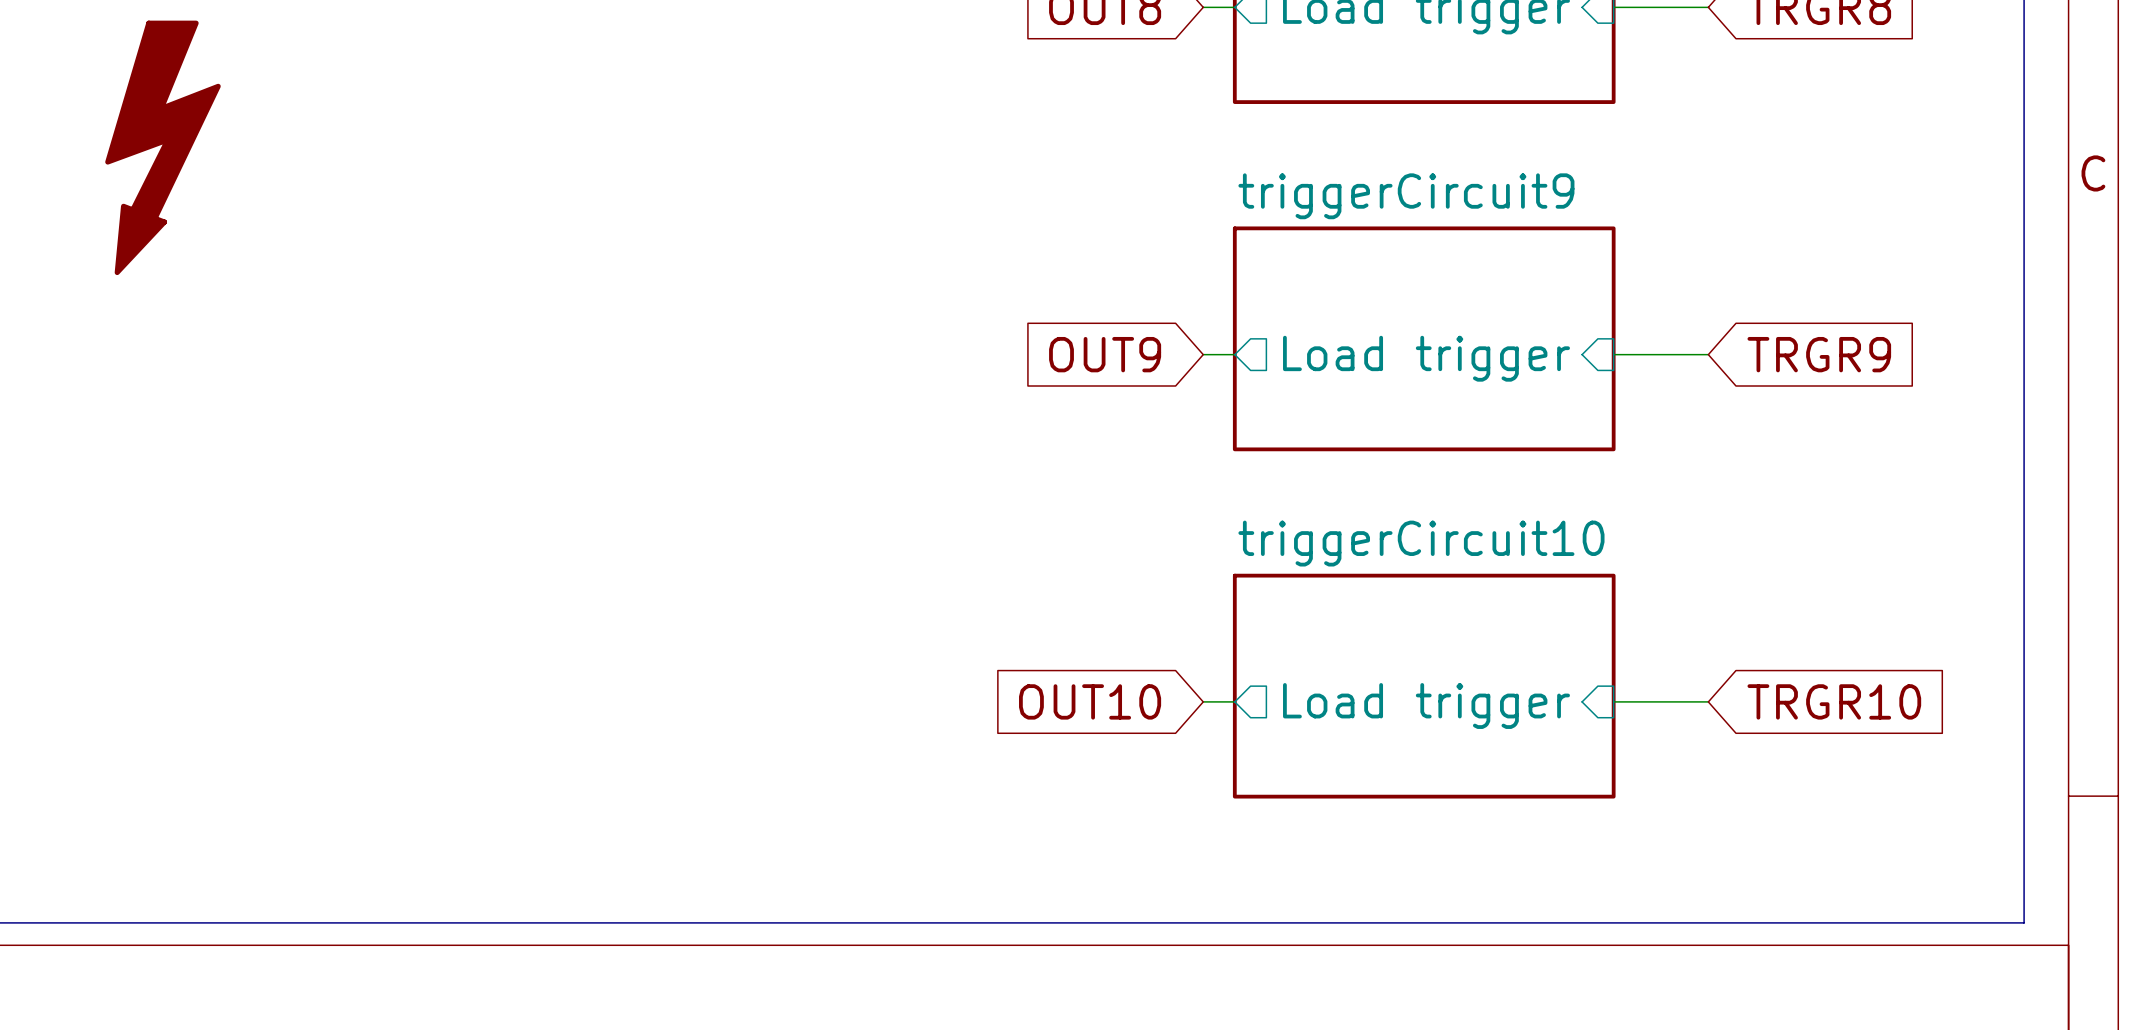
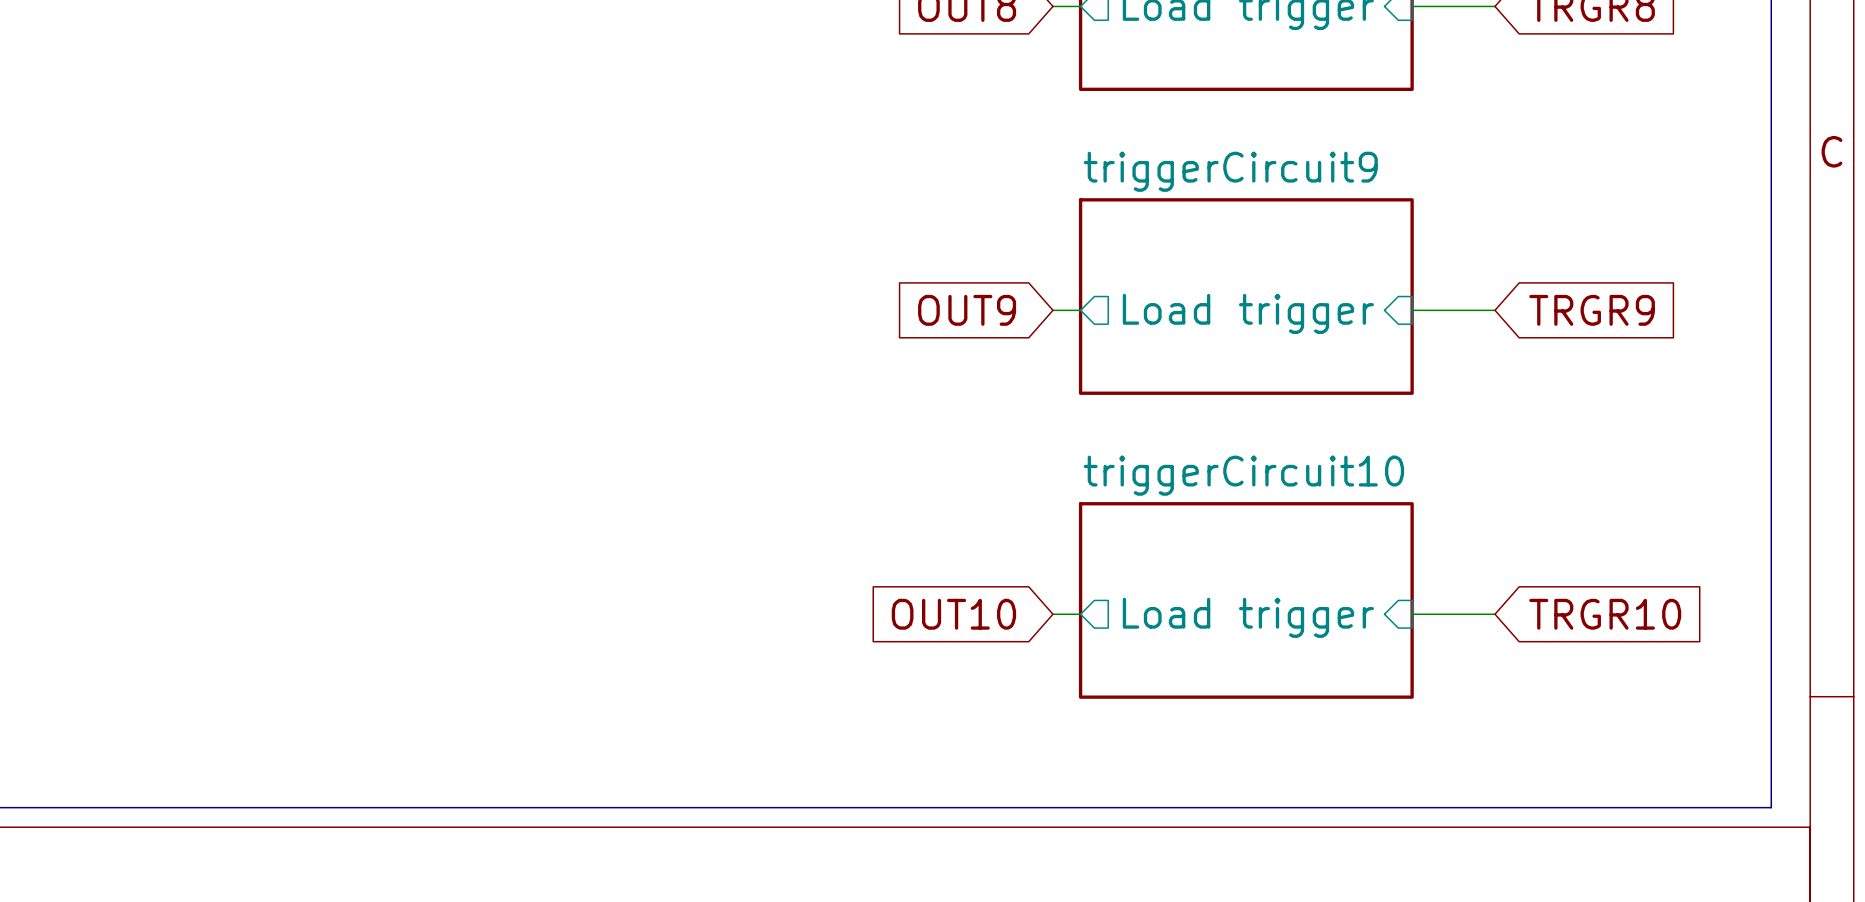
power symbol: (162, 147) -> none

